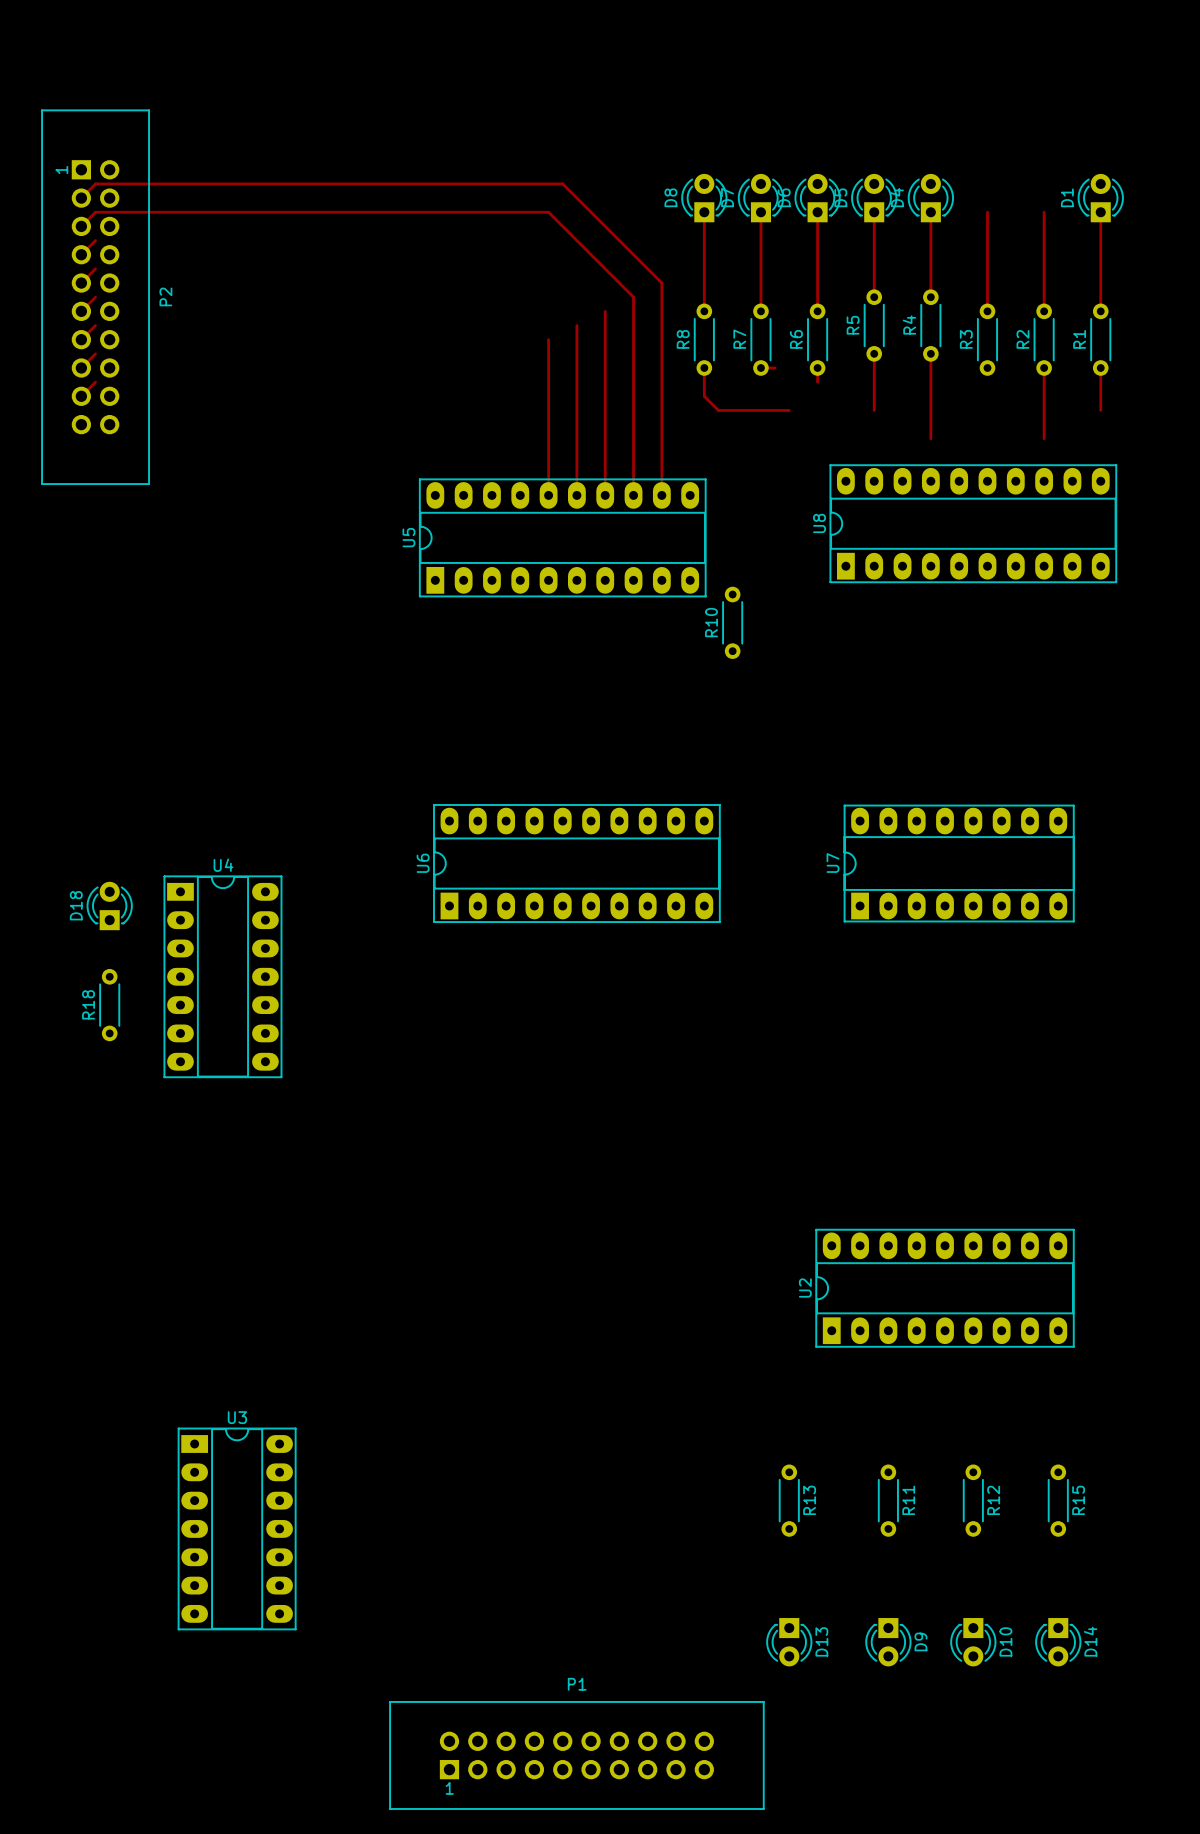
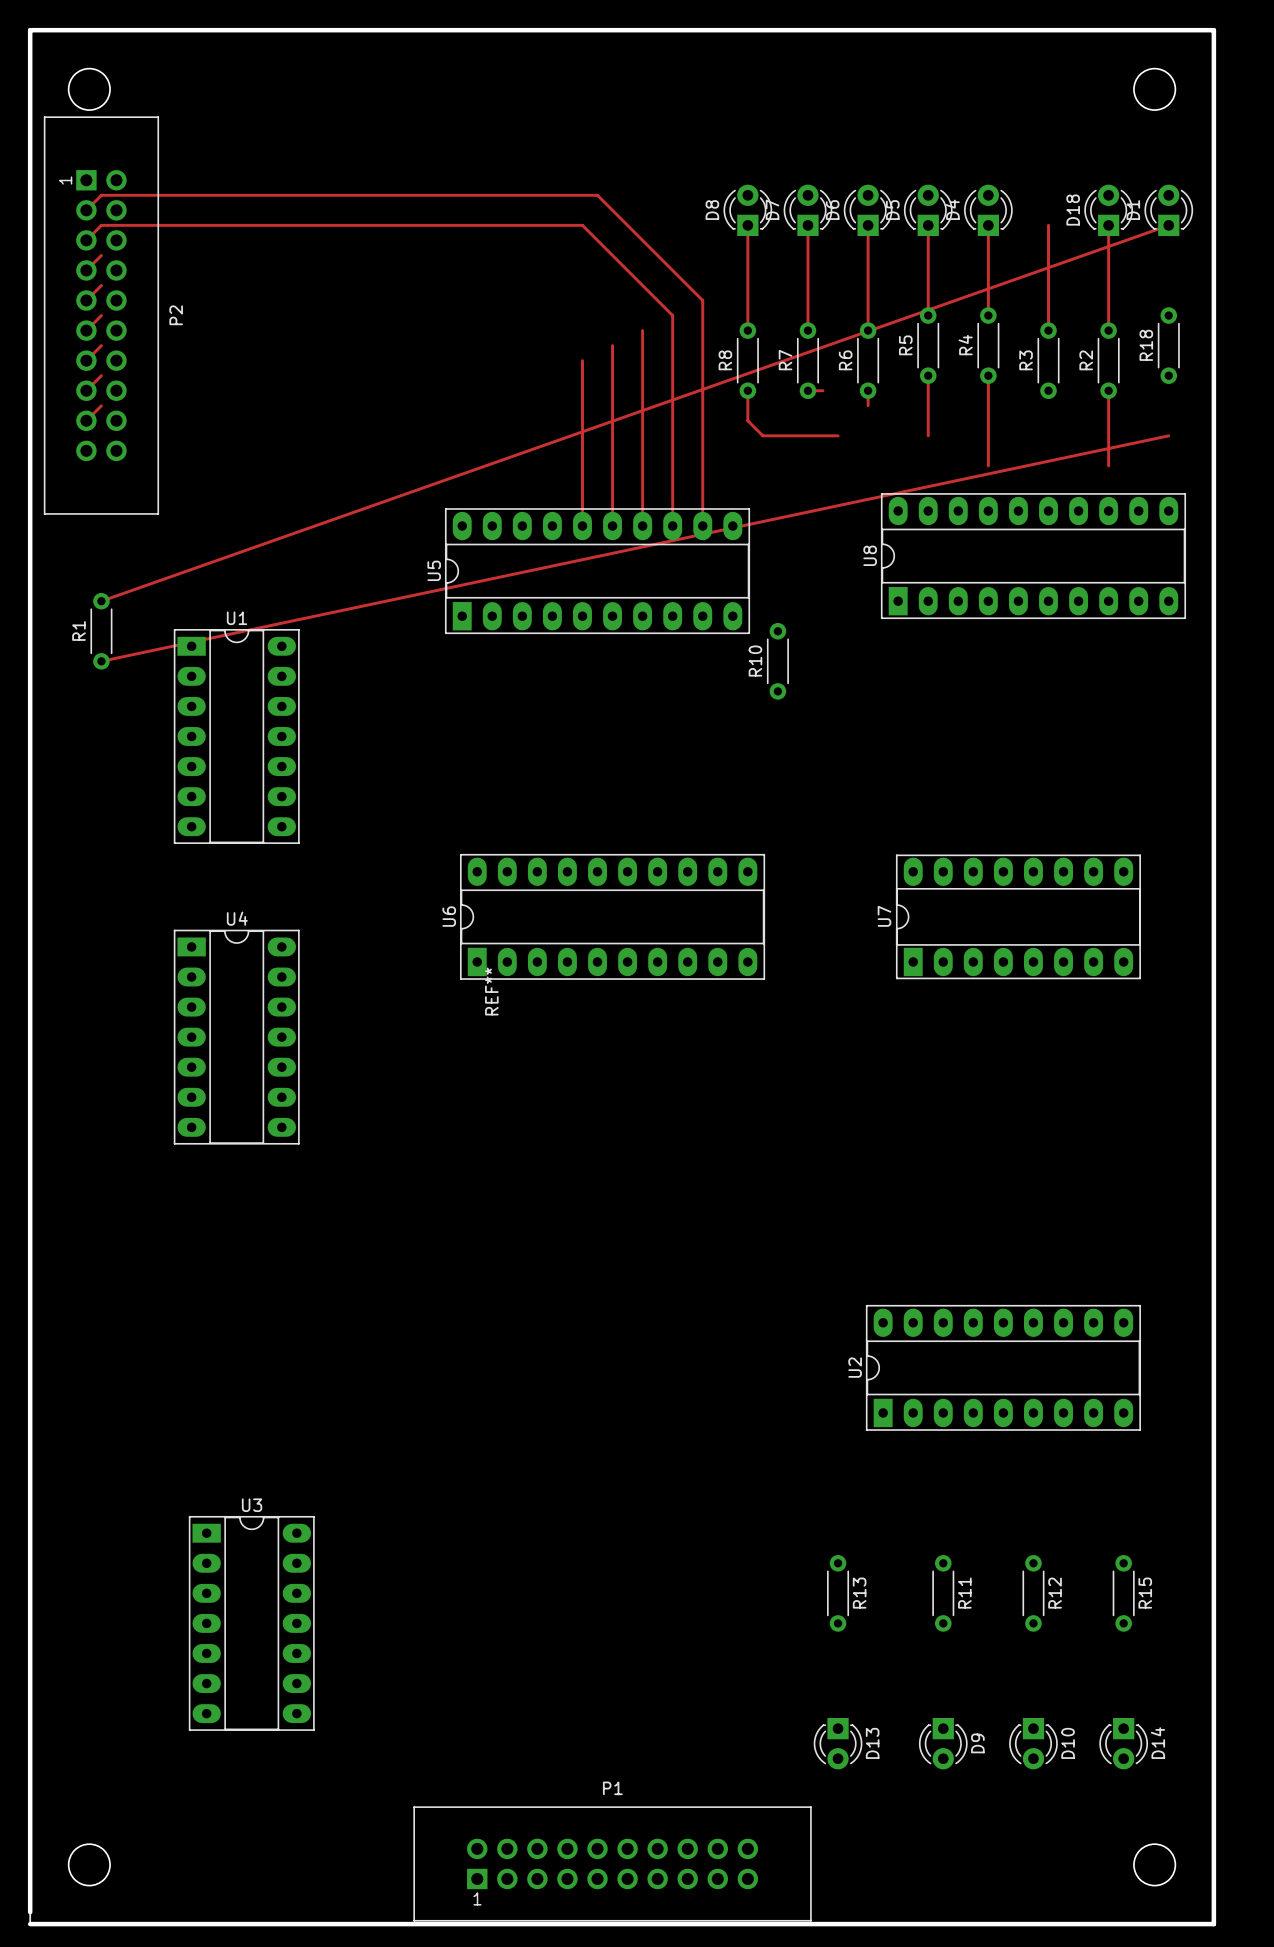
track: (1100, 212) (1100, 311) -> (1168, 225) (101, 601)
R1 position: (1100, 339) -> (101, 631)
track: (1100, 367) (1100, 410) -> (101, 661) (1168, 435)
U1: none -> (236, 736)
D18 position: (109, 905) -> (1108, 210)
REF**: none -> (622, 977)
R18 position: (109, 1005) -> (1168, 345)

